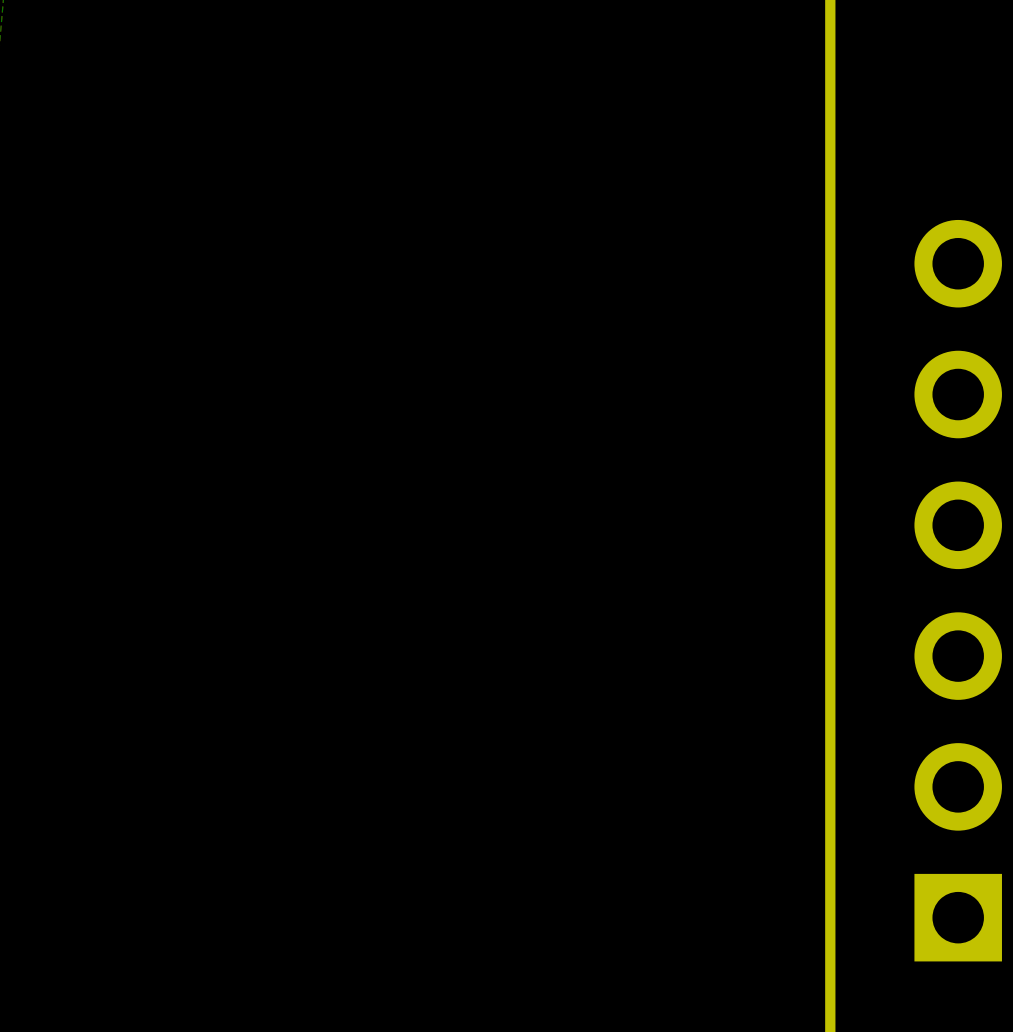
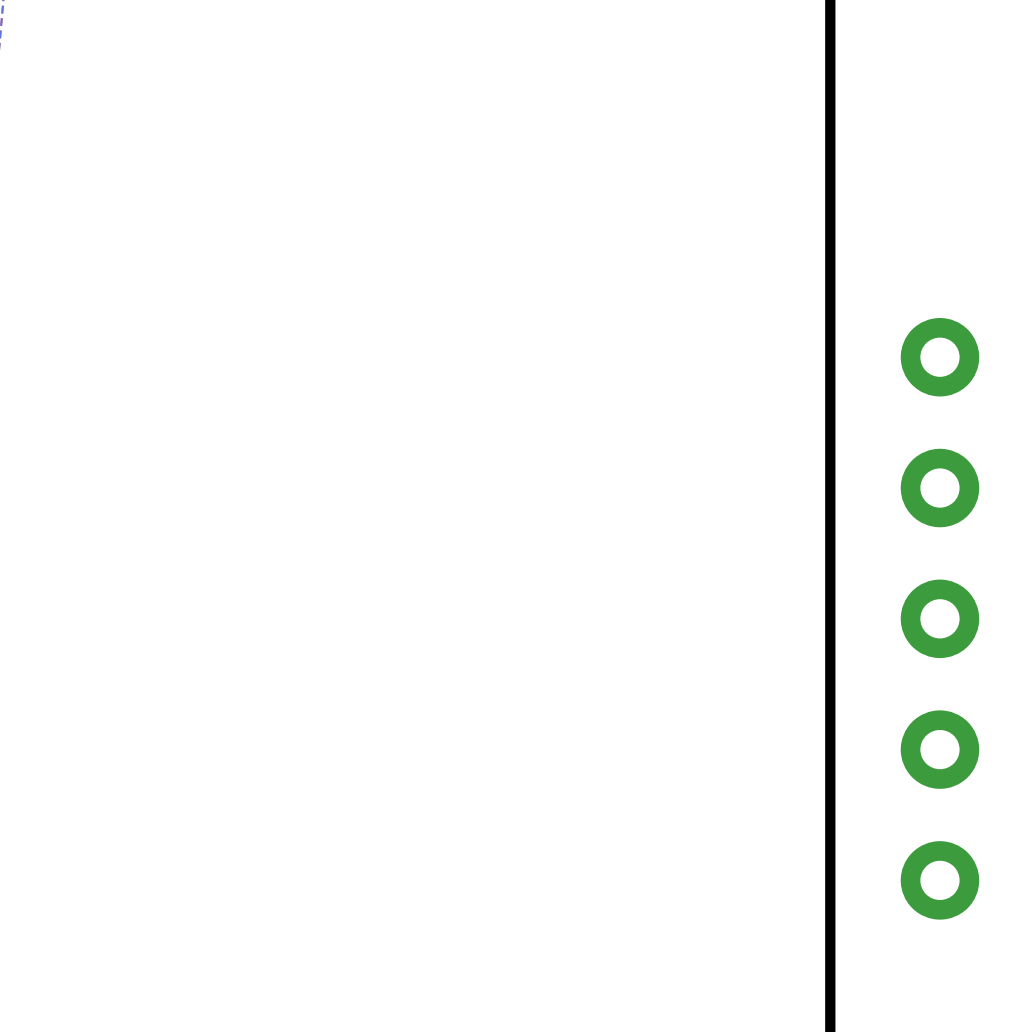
part footprint: [914, 219, 1002, 962] -> [900, 318, 980, 920]

